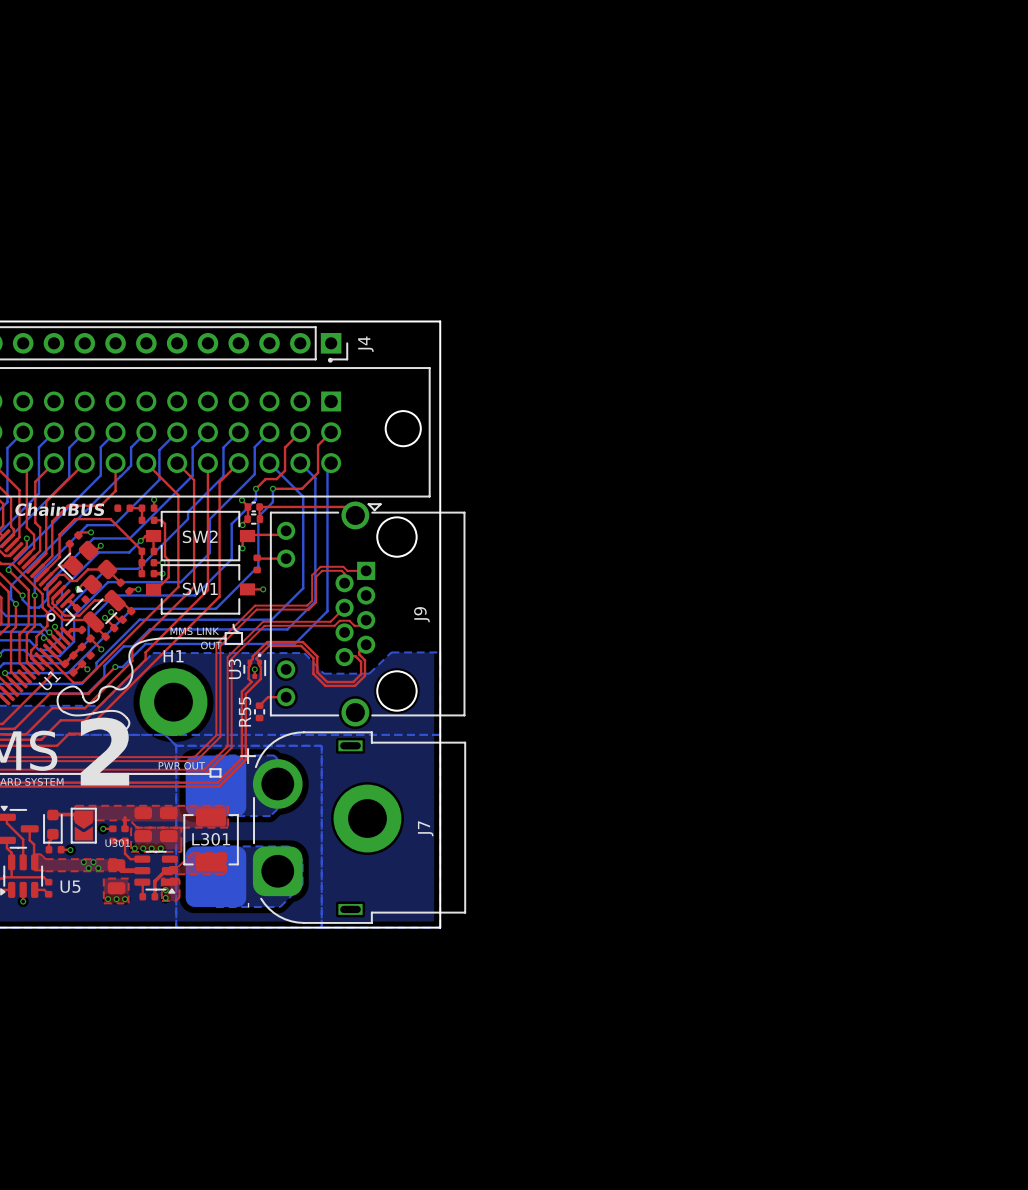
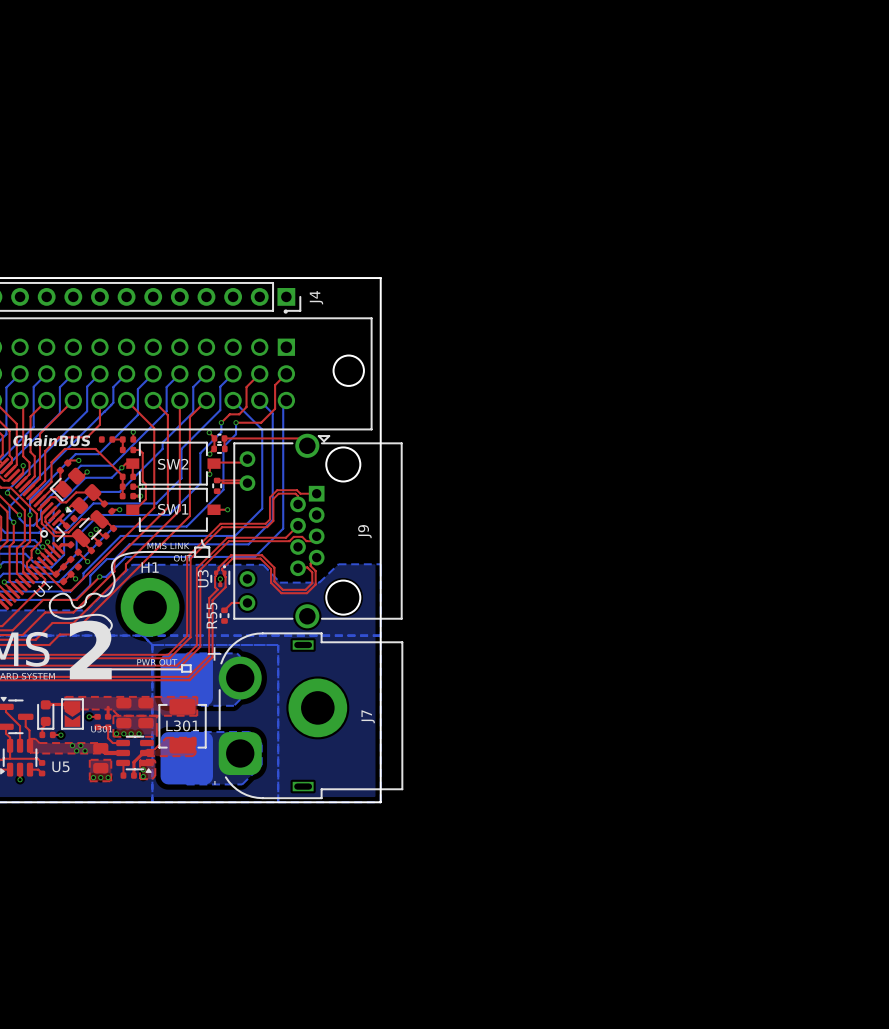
part footprint: [253, 554, 261, 574] -> [212, 477, 222, 495]
top track: none -> (217, 480) (244, 480) (246, 482)

